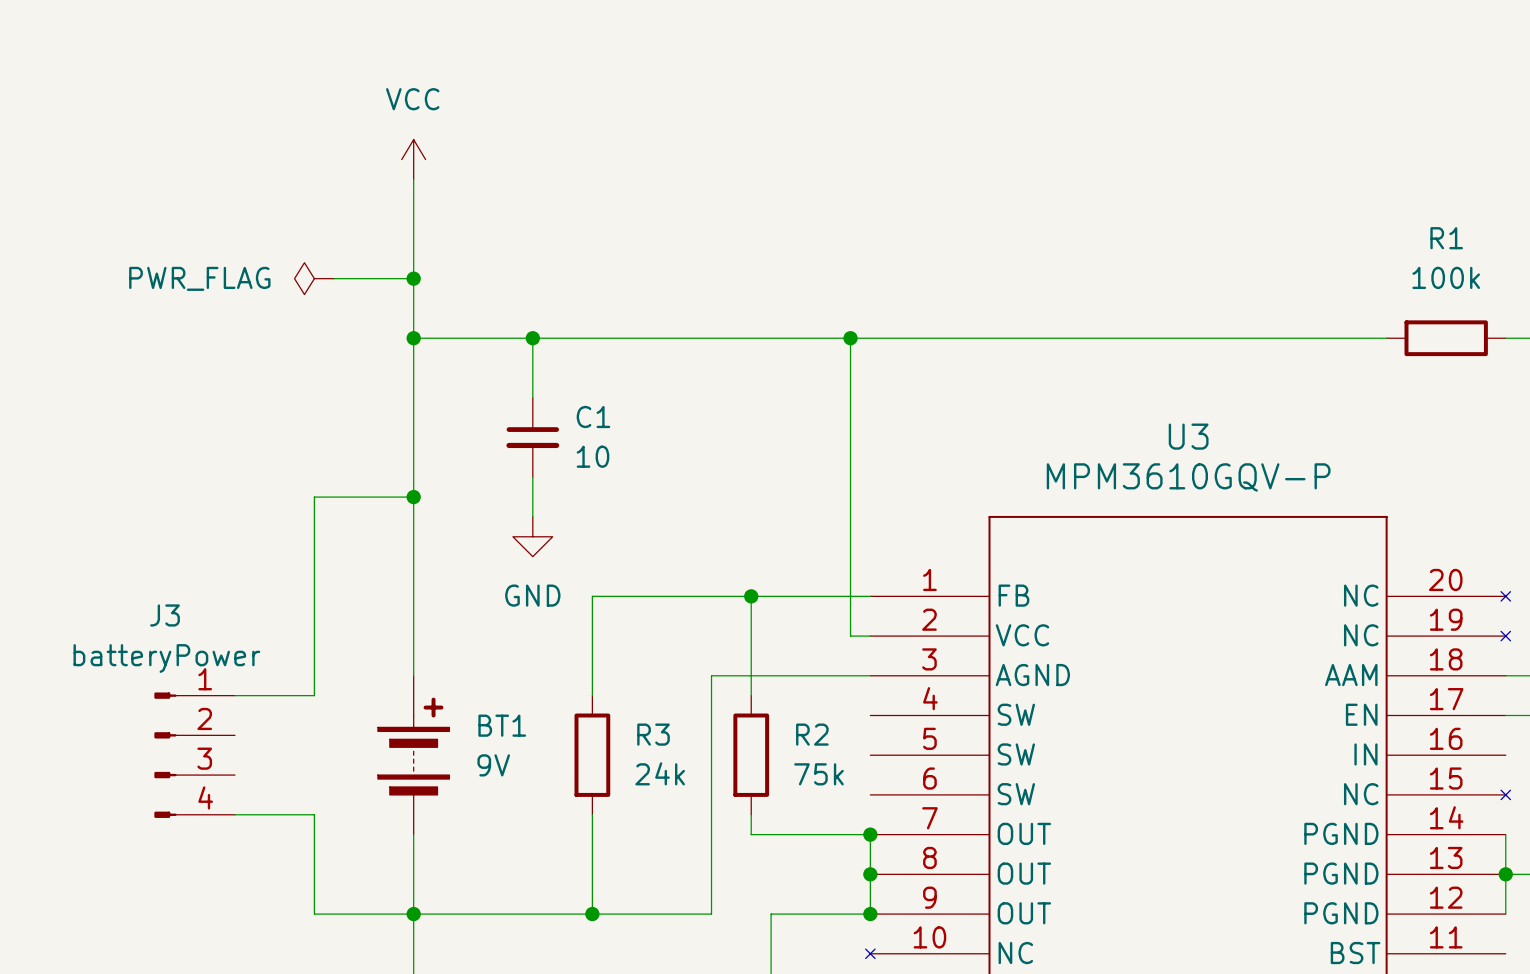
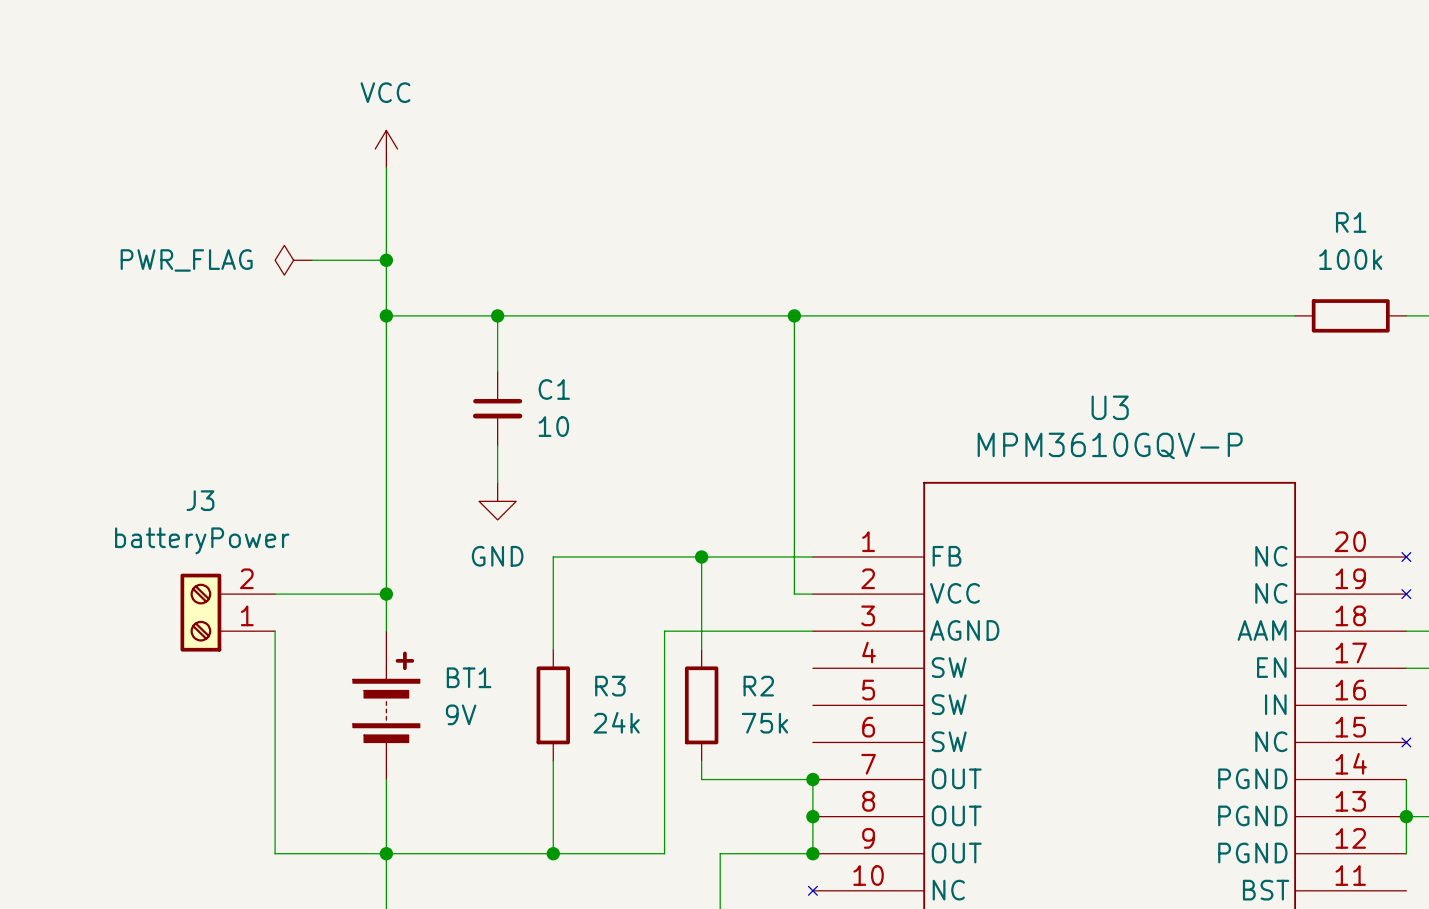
wire: (413, 497) (314, 497) (314, 695) (234, 695) -> none
junction: (413, 497) -> none
wire: none -> (275, 594) (386, 594)
junction: none -> (386, 594)
J3 symbol: [154, 692, 235, 818] -> [180, 573, 276, 652]
wire: (234, 814) (314, 814) (314, 914) -> (275, 631) (275, 853) (293, 853)

